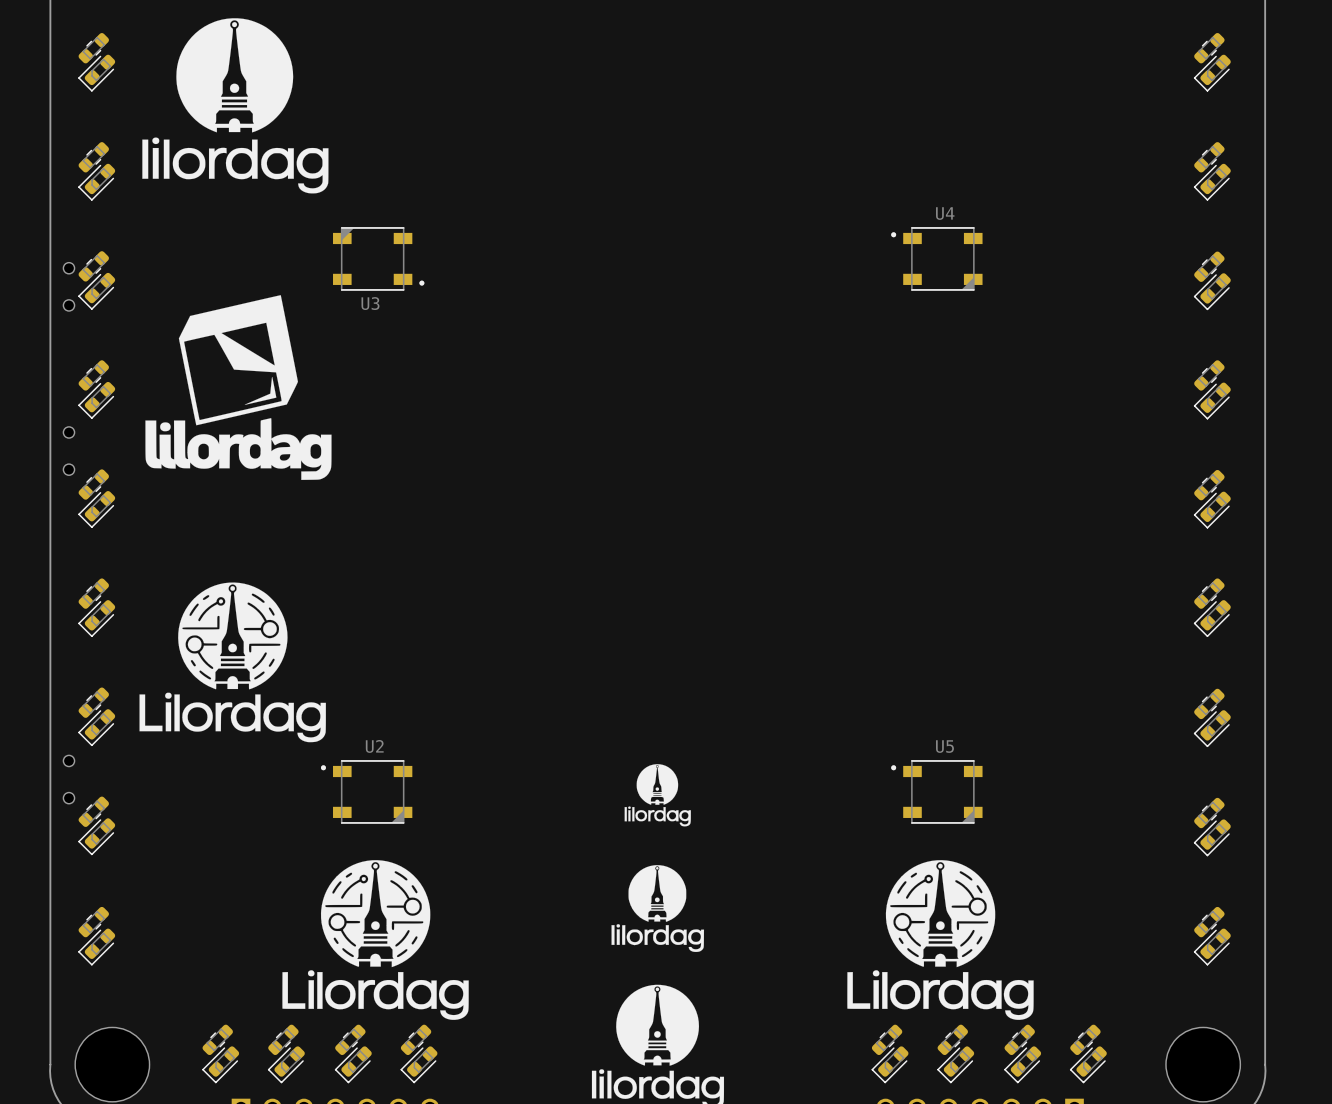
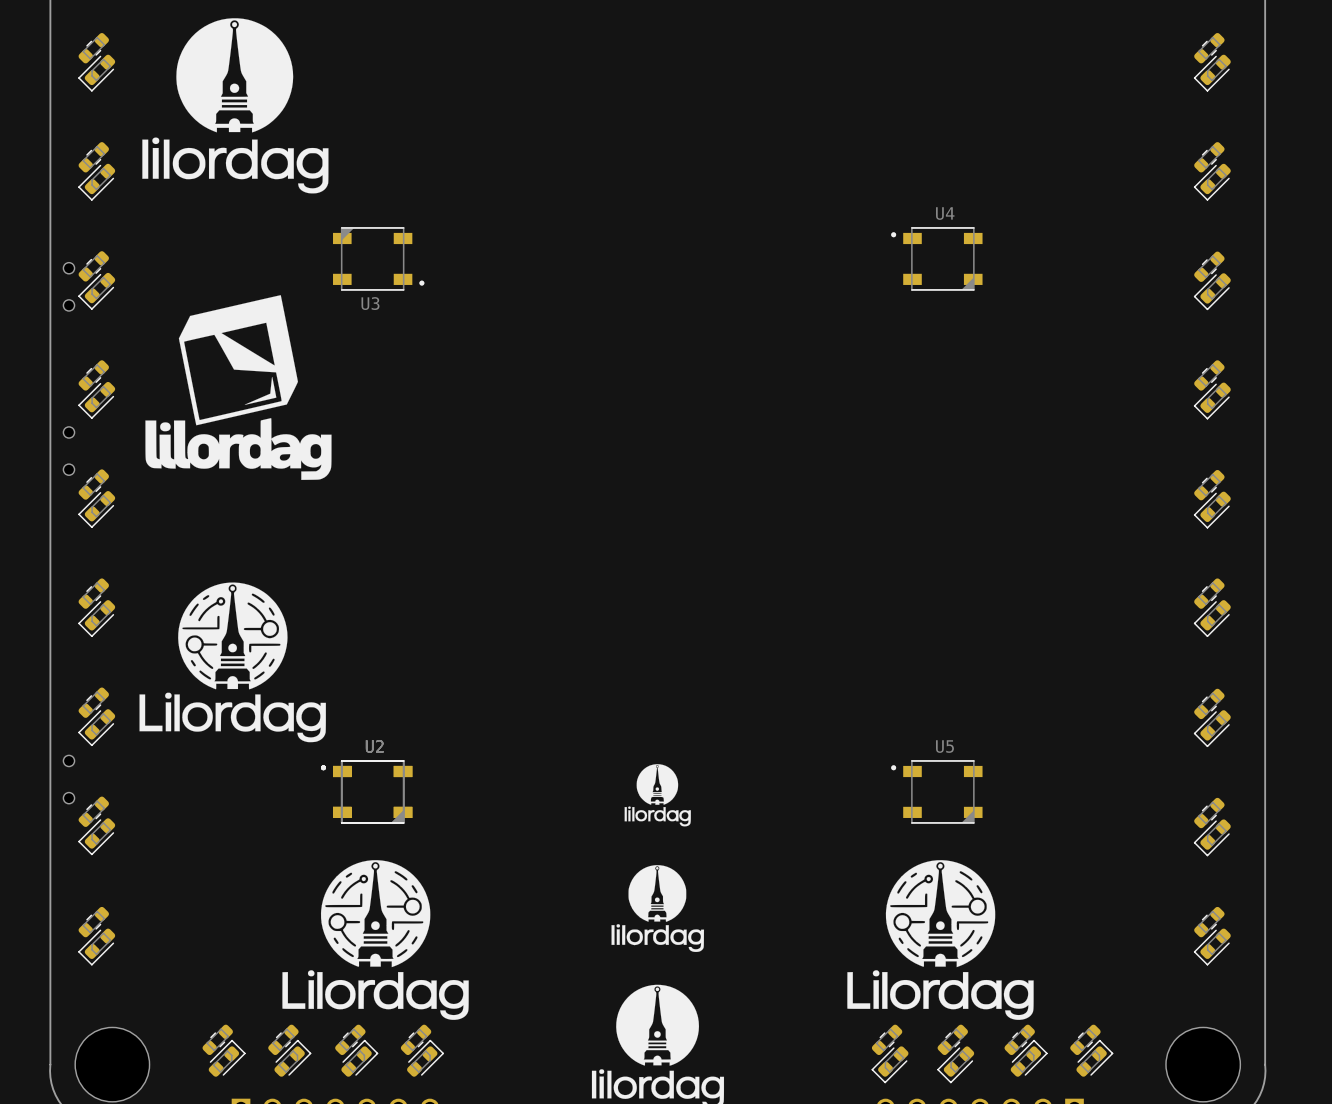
U2: none -> (366, 791)
part rotation: 0° (220, 1064) -> 180° (227, 1058)
part rotation: 0° (286, 1064) -> 180° (292, 1058)
part rotation: 0° (353, 1064) -> 180° (359, 1058)
part rotation: 0° (418, 1064) -> 180° (425, 1058)
part rotation: 0° (1022, 1064) -> 180° (1029, 1058)
part rotation: 0° (1088, 1064) -> 180° (1094, 1058)

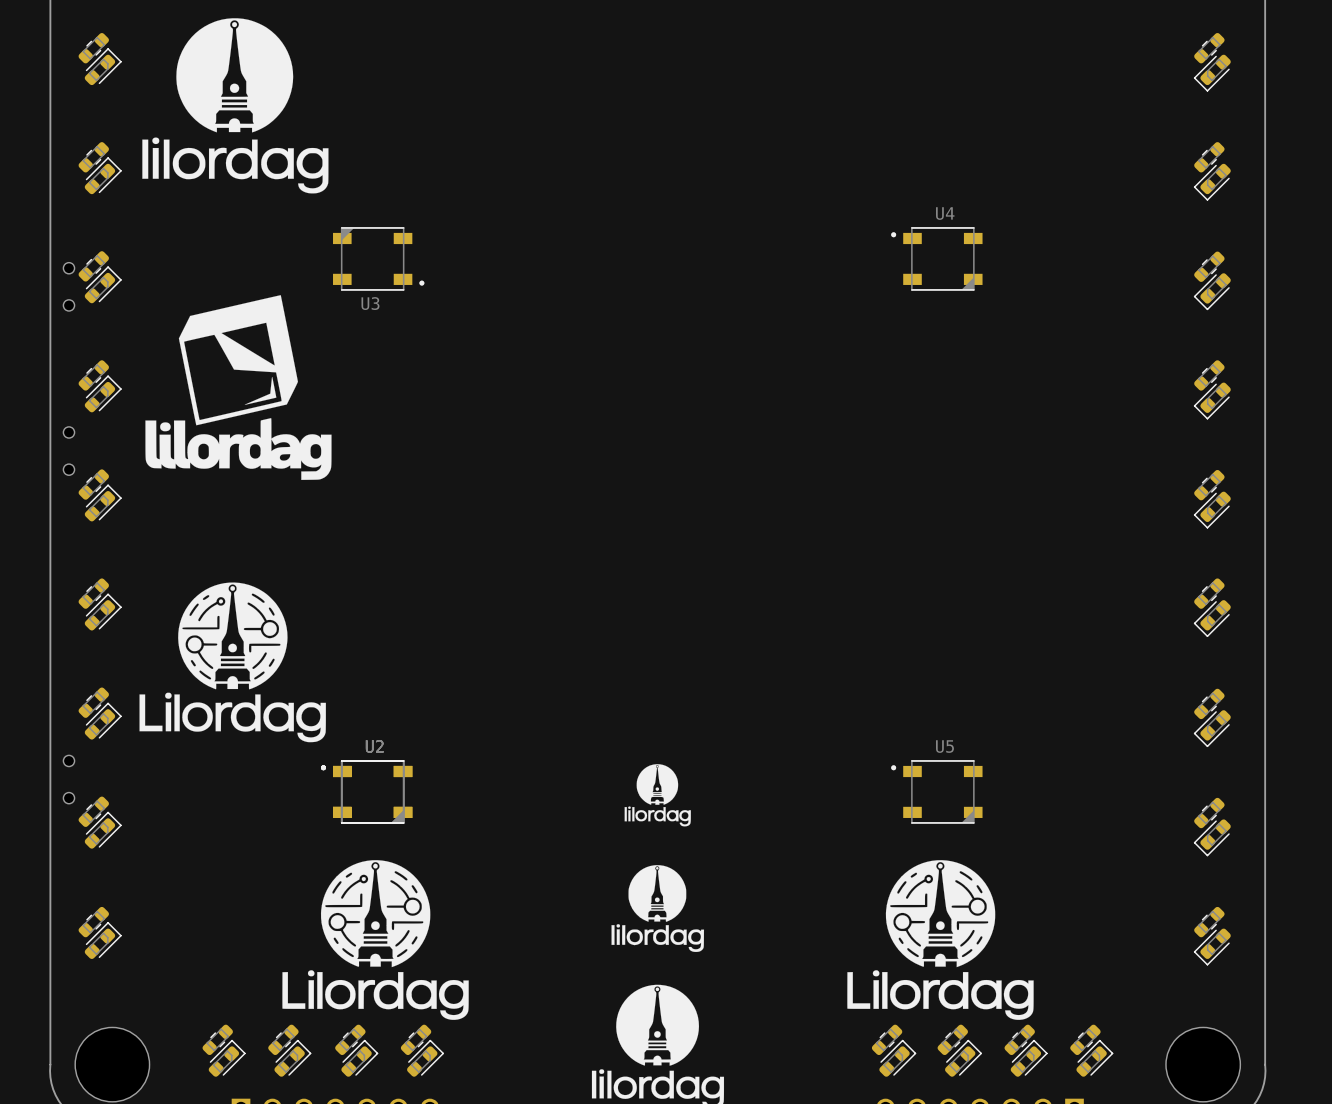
part rotation: 0° (96, 73) -> 180° (103, 66)
part rotation: 0° (96, 182) -> 180° (103, 175)
part rotation: 0° (96, 291) -> 180° (103, 284)
part rotation: 0° (96, 400) -> 180° (103, 393)
part rotation: 0° (96, 509) -> 180° (103, 502)
part rotation: 0° (96, 618) -> 180° (103, 612)
part rotation: 0° (96, 727) -> 180° (103, 721)
part rotation: 0° (96, 836) -> 180° (103, 830)
part rotation: 0° (96, 947) -> 180° (103, 940)
part rotation: 0° (890, 1064) -> 180° (897, 1058)
part rotation: 0° (955, 1064) -> 180° (963, 1058)

